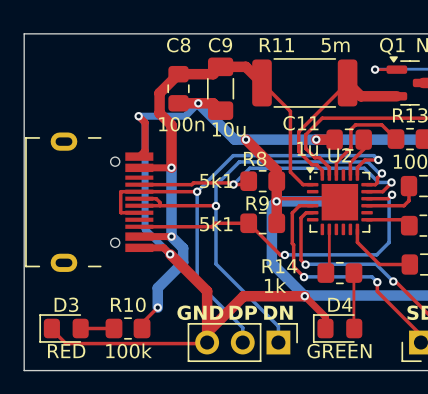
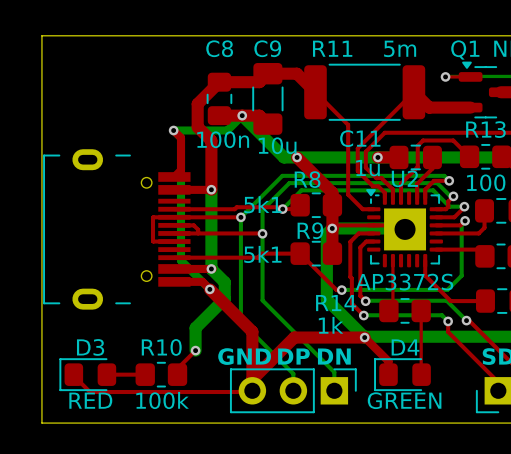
U2 footprint: [306, 167, 373, 236] -> [366, 189, 443, 268]
U2 value: none -> AP3372S (404, 282)

